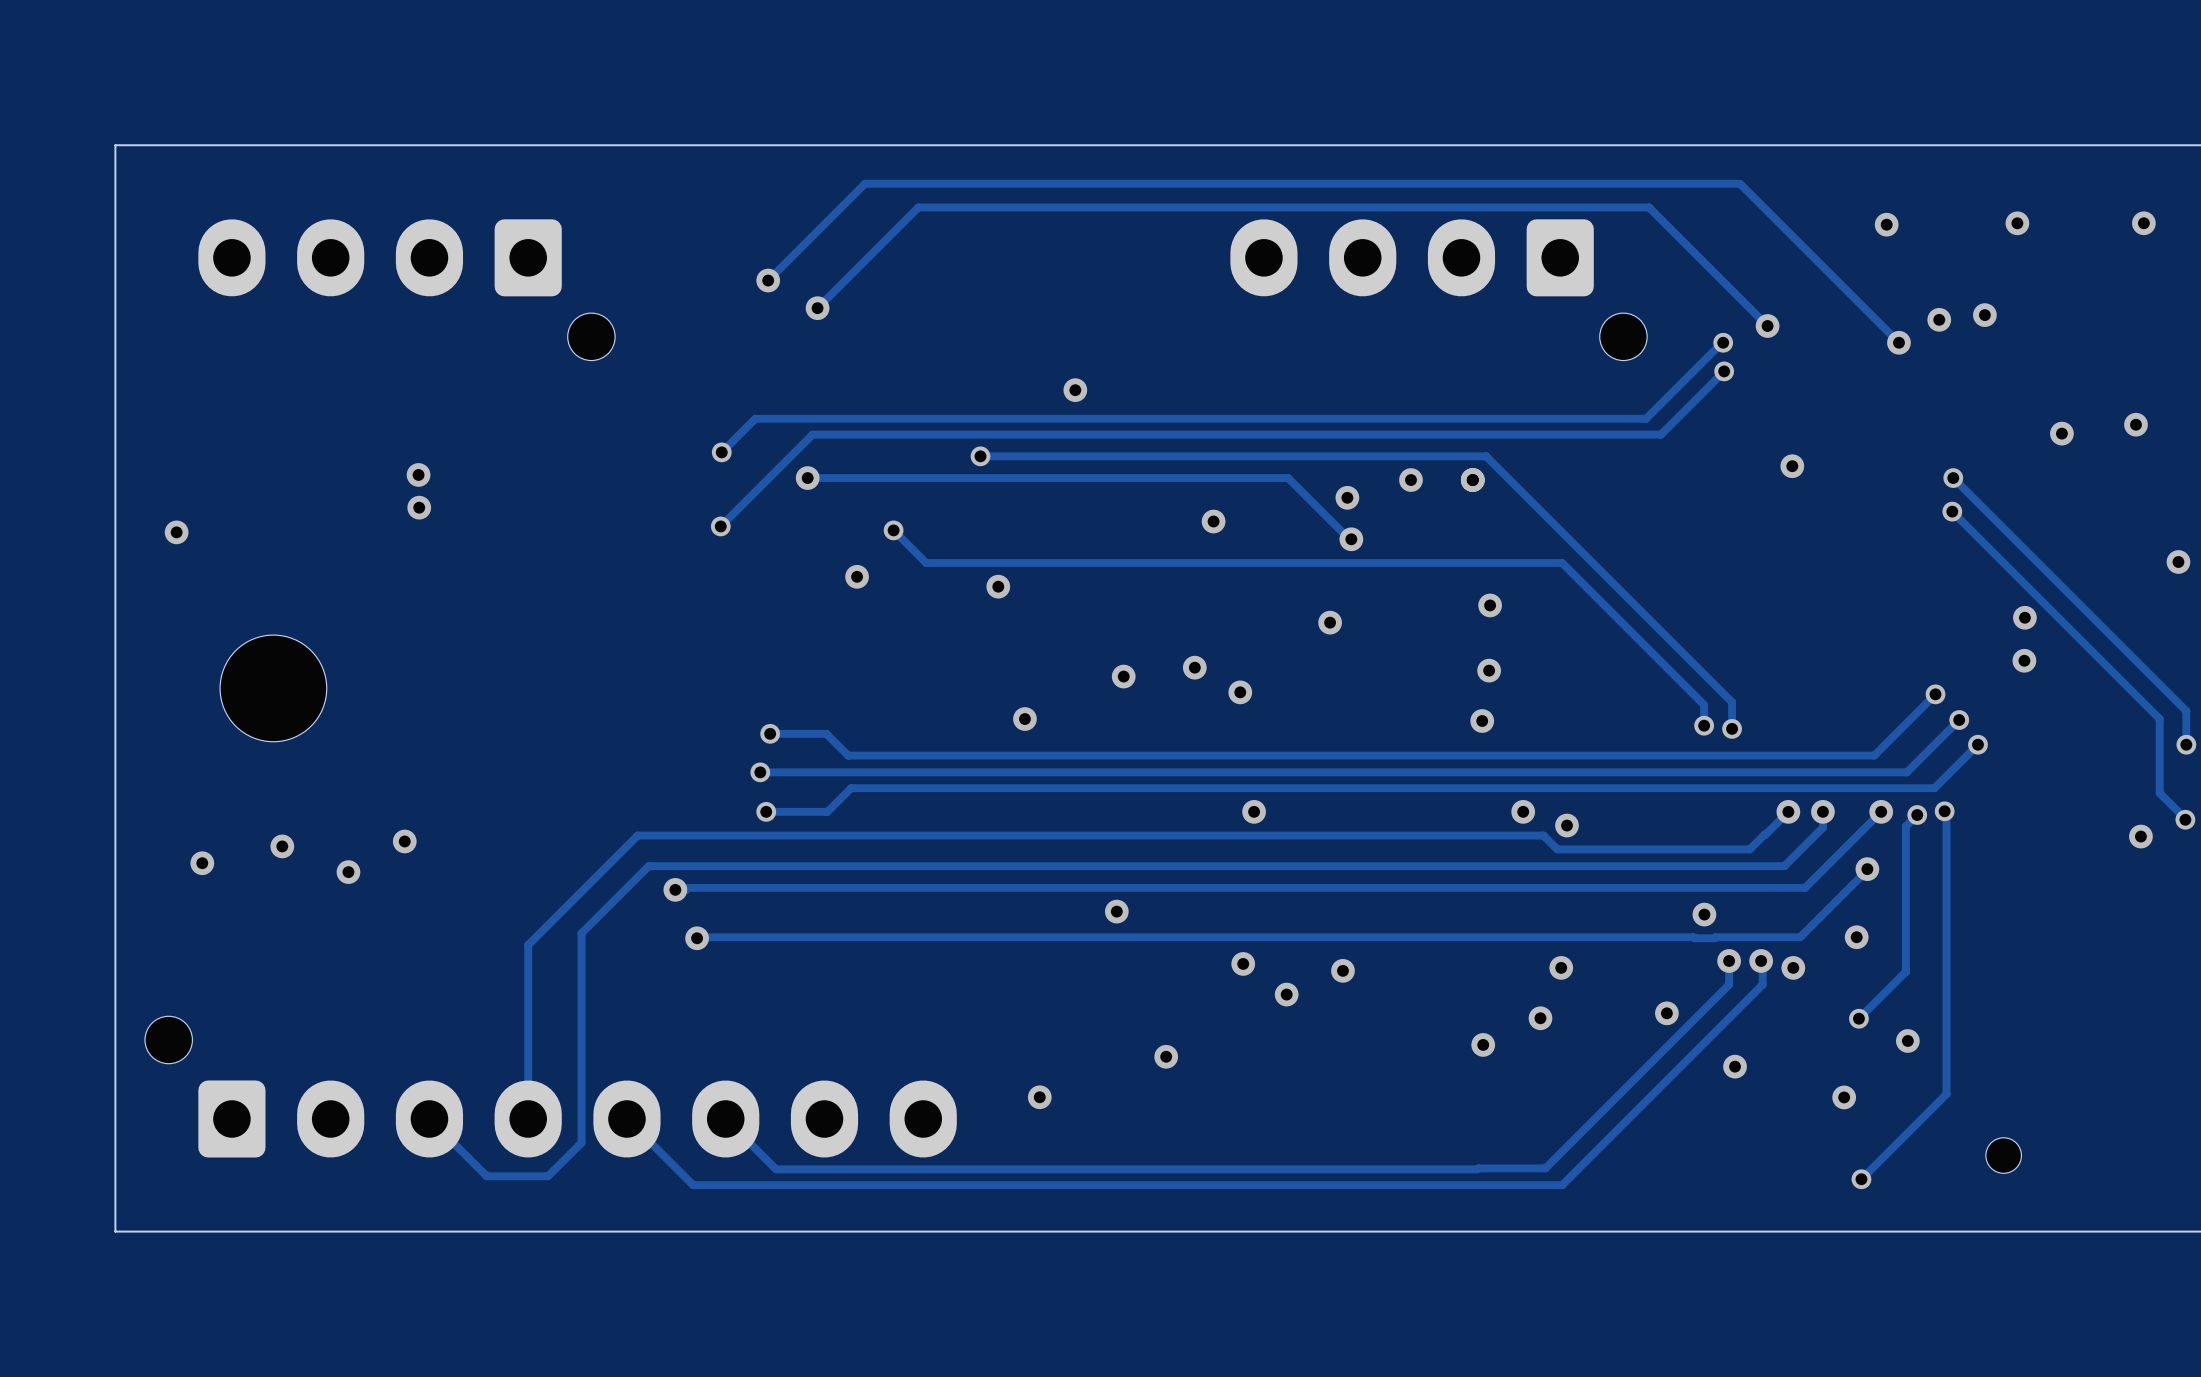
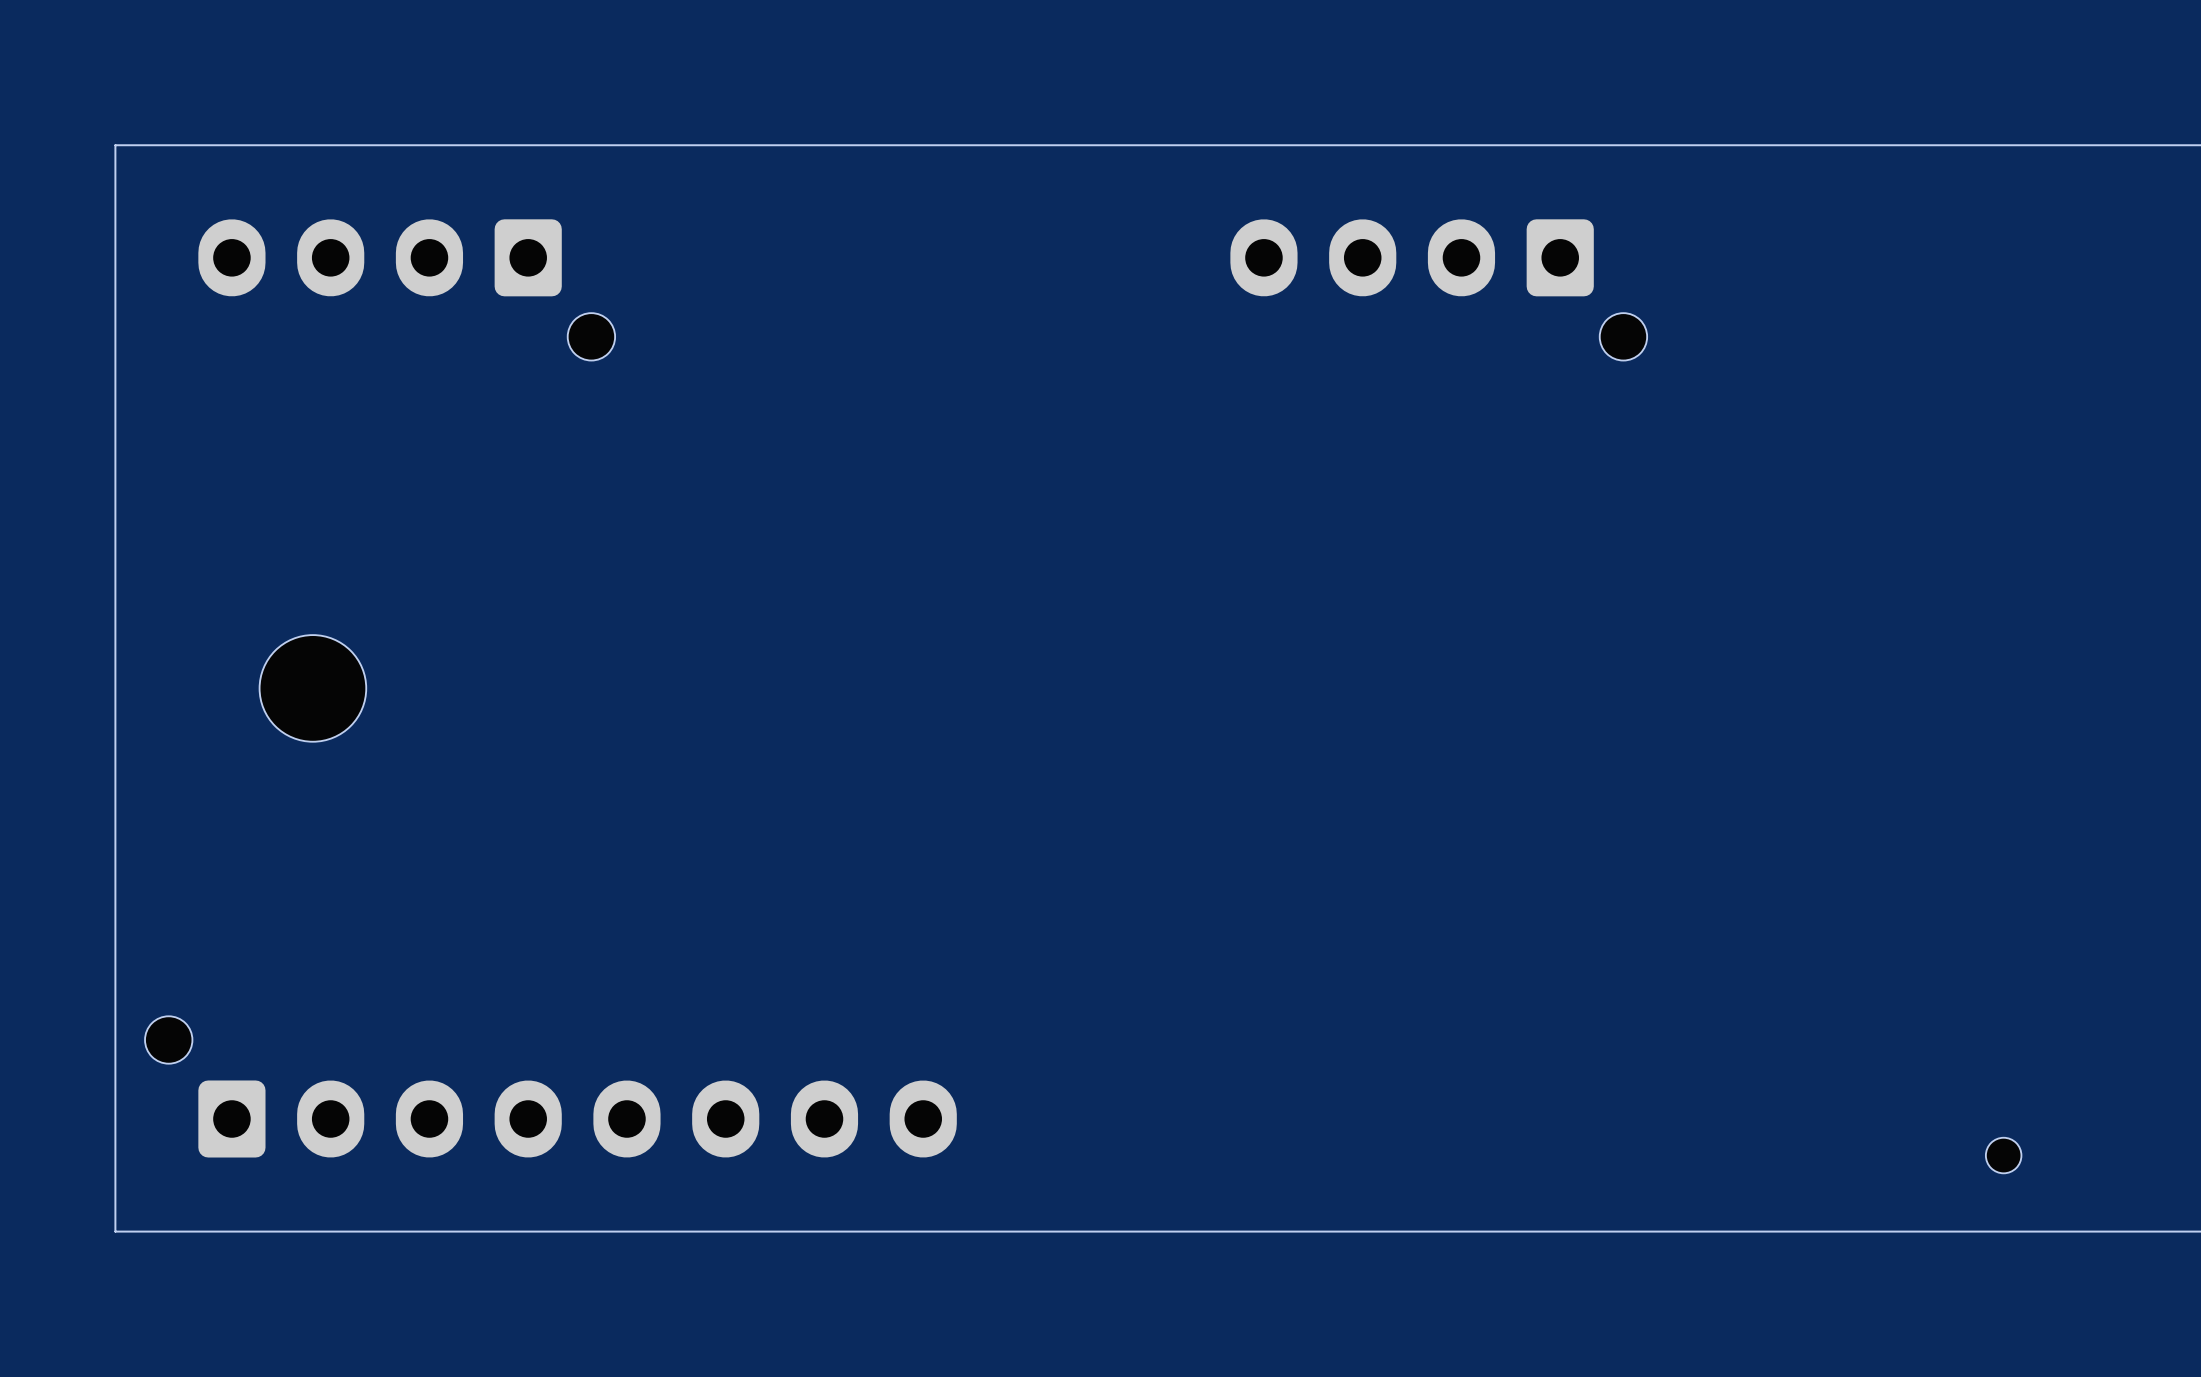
via: (2017, 223) -> none
via: (2143, 223) -> none
via: (1886, 224) -> none
track: (768, 280) (864, 183) (1739, 183) (1898, 342) -> none
via: (768, 280) -> none
track: (817, 308) (918, 207) (1649, 207) (1767, 325) -> none
via: (817, 308) -> none
via: (1984, 315) -> none
via: (1939, 319) -> none
via: (1767, 325) -> none
track: (1723, 342) (1646, 418) (755, 418) (721, 452) -> none
via: (1723, 342) -> none
via: (1898, 342) -> none
track: (1724, 371) (1660, 434) (812, 434) (720, 526) -> none
via: (1724, 371) -> none
via: (1075, 390) -> none
via: (2136, 424) -> none
via: (2061, 433) -> none
via: (721, 452) -> none
track: (980, 456) (1486, 456) (1732, 702) (1732, 728) -> none
via: (980, 456) -> none
via: (1792, 466) -> none
via: (418, 474) -> none
track: (807, 478) (1288, 478) (1351, 539) -> none
via: (807, 478) -> none
track: (1953, 478) (2186, 711) (2186, 744) -> none
via: (1953, 478) -> none
via: (1411, 480) -> none
via: (1472, 480) -> none
via: (1347, 497) -> none
via: (419, 507) -> none
track: (1952, 511) (2159, 719) (2159, 793) (2185, 819) -> none
via: (1952, 511) -> none
via: (1213, 521) -> none
via: (720, 526) -> none
track: (893, 530) (926, 562) (1562, 562) (1704, 704) (1704, 725) -> none
via: (893, 530) -> none
via: (176, 532) -> none
via: (1351, 539) -> none
via: (2178, 562) -> none
via: (857, 576) -> none
via: (998, 586) -> none
via: (1490, 605) -> none
via: (2024, 617) -> none
via: (1330, 622) -> none
via: (2024, 660) -> none
via: (1194, 667) -> none
via: (1489, 670) -> none
via: (1123, 676) -> none
part position: (273, 688) -> (312, 688)
via: (1240, 692) -> none
track: (1935, 694) (1874, 755) (848, 755) (826, 733) (770, 733) -> none
via: (1935, 694) -> none
via: (1024, 719) -> none
track: (1959, 720) (1906, 772) (760, 772) -> none
via: (1959, 720) -> none
via: (1482, 721) -> none
via: (1704, 725) -> none
via: (1732, 728) -> none
via: (770, 733) -> none
track: (1977, 744) (1934, 788) (851, 788) (827, 811) (766, 811) -> none
via: (1977, 744) -> none
via: (2186, 744) -> none
via: (760, 772) -> none
via: (766, 811) -> none
via: (1254, 811) -> none
via: (1523, 811) -> none
track: (1788, 811) (1749, 849) (1557, 849) (1543, 835) (637, 835) (528, 945) (528, 1119) -> none
via: (1788, 811) -> none
track: (1822, 811) (1822, 827) (1784, 866) (648, 866) (581, 933) (581, 1142) (548, 1176) (486, 1176) (429, 1119) -> none
via: (1822, 811) -> none
track: (1881, 811) (1805, 887) (688, 887) (686, 889) (675, 889) -> none
via: (1881, 811) -> none
track: (1944, 811) (1946, 813) (1946, 1094) (1861, 1179) -> none
via: (1944, 811) -> none
track: (1917, 815) (1905, 826) (1905, 971) (1858, 1018) -> none
via: (1917, 815) -> none
via: (2185, 819) -> none
via: (1567, 825) -> none
via: (2140, 836) -> none
via: (404, 841) -> none
via: (282, 846) -> none
via: (202, 863) -> none
track: (1867, 869) (1800, 937) (697, 938) -> none
via: (1867, 869) -> none
via: (348, 872) -> none
via: (675, 889) -> none
via: (1116, 911) -> none
via: (1704, 914) -> none
via: (1856, 937) -> none
via: (697, 938) -> none
track: (1729, 960) (1729, 984) (1545, 1168) (776, 1169) (725, 1119) -> none
via: (1729, 960) -> none
track: (1761, 960) (1762, 984) (1562, 1185) (693, 1185) (626, 1119) -> none
via: (1761, 960) -> none
via: (1243, 963) -> none
via: (1561, 967) -> none
via: (1793, 967) -> none
via: (1342, 970) -> none
via: (1286, 994) -> none
via: (1666, 1013) -> none
via: (1540, 1018) -> none
via: (1858, 1018) -> none
via: (1907, 1040) -> none
via: (1483, 1044) -> none
via: (1166, 1056) -> none
via: (1735, 1066) -> none
via: (1039, 1097) -> none
via: (1844, 1097) -> none
via: (1861, 1179) -> none

